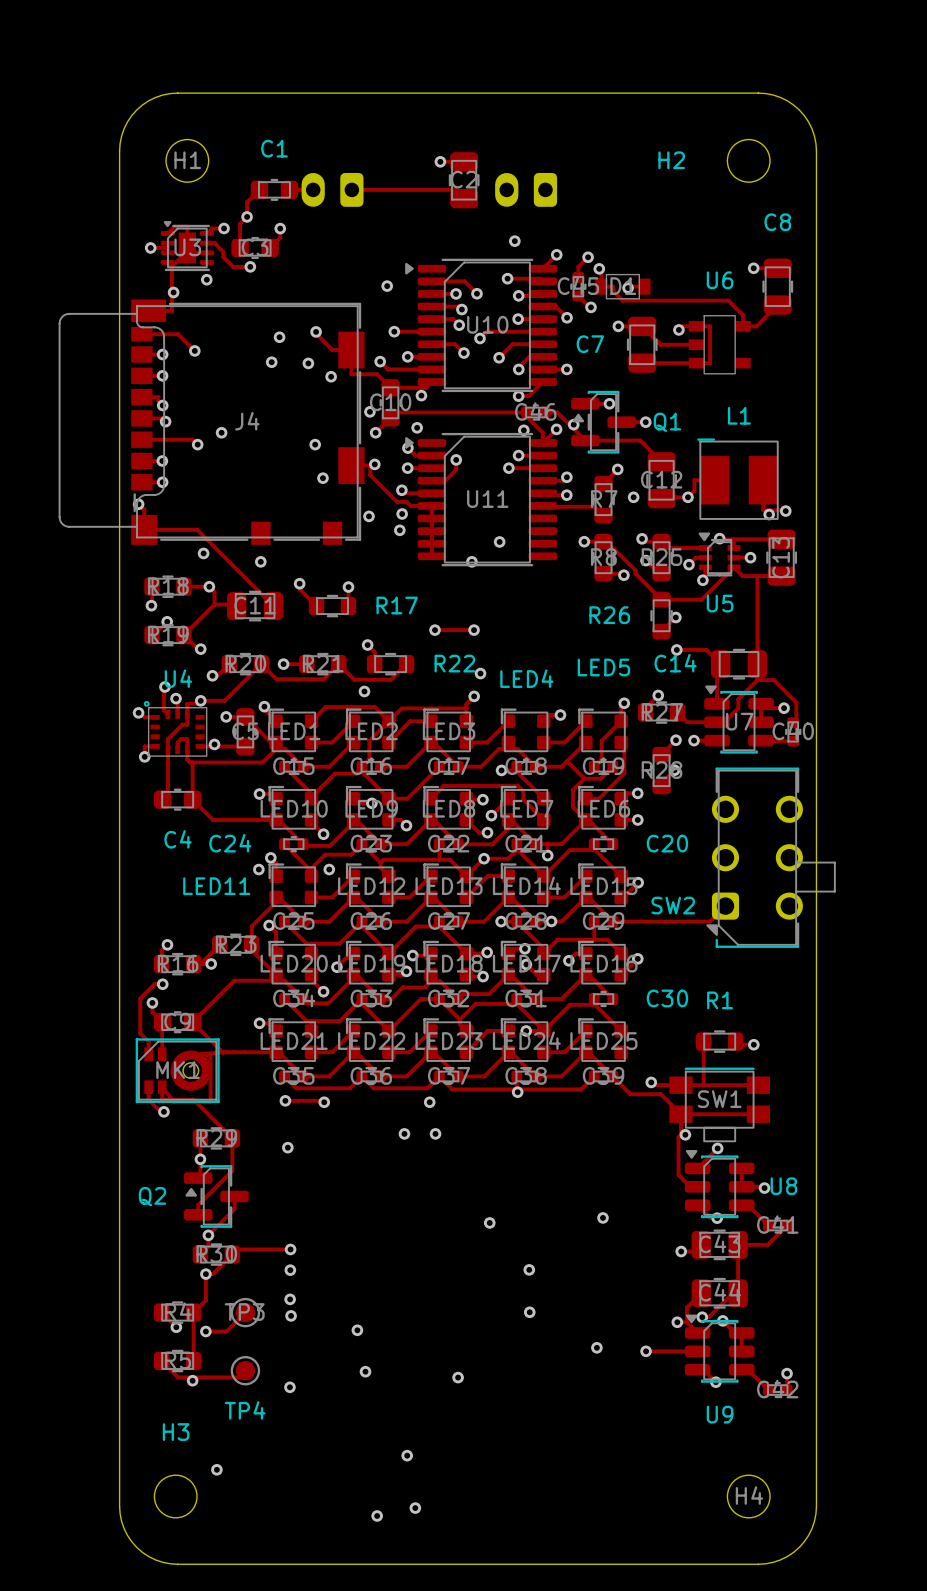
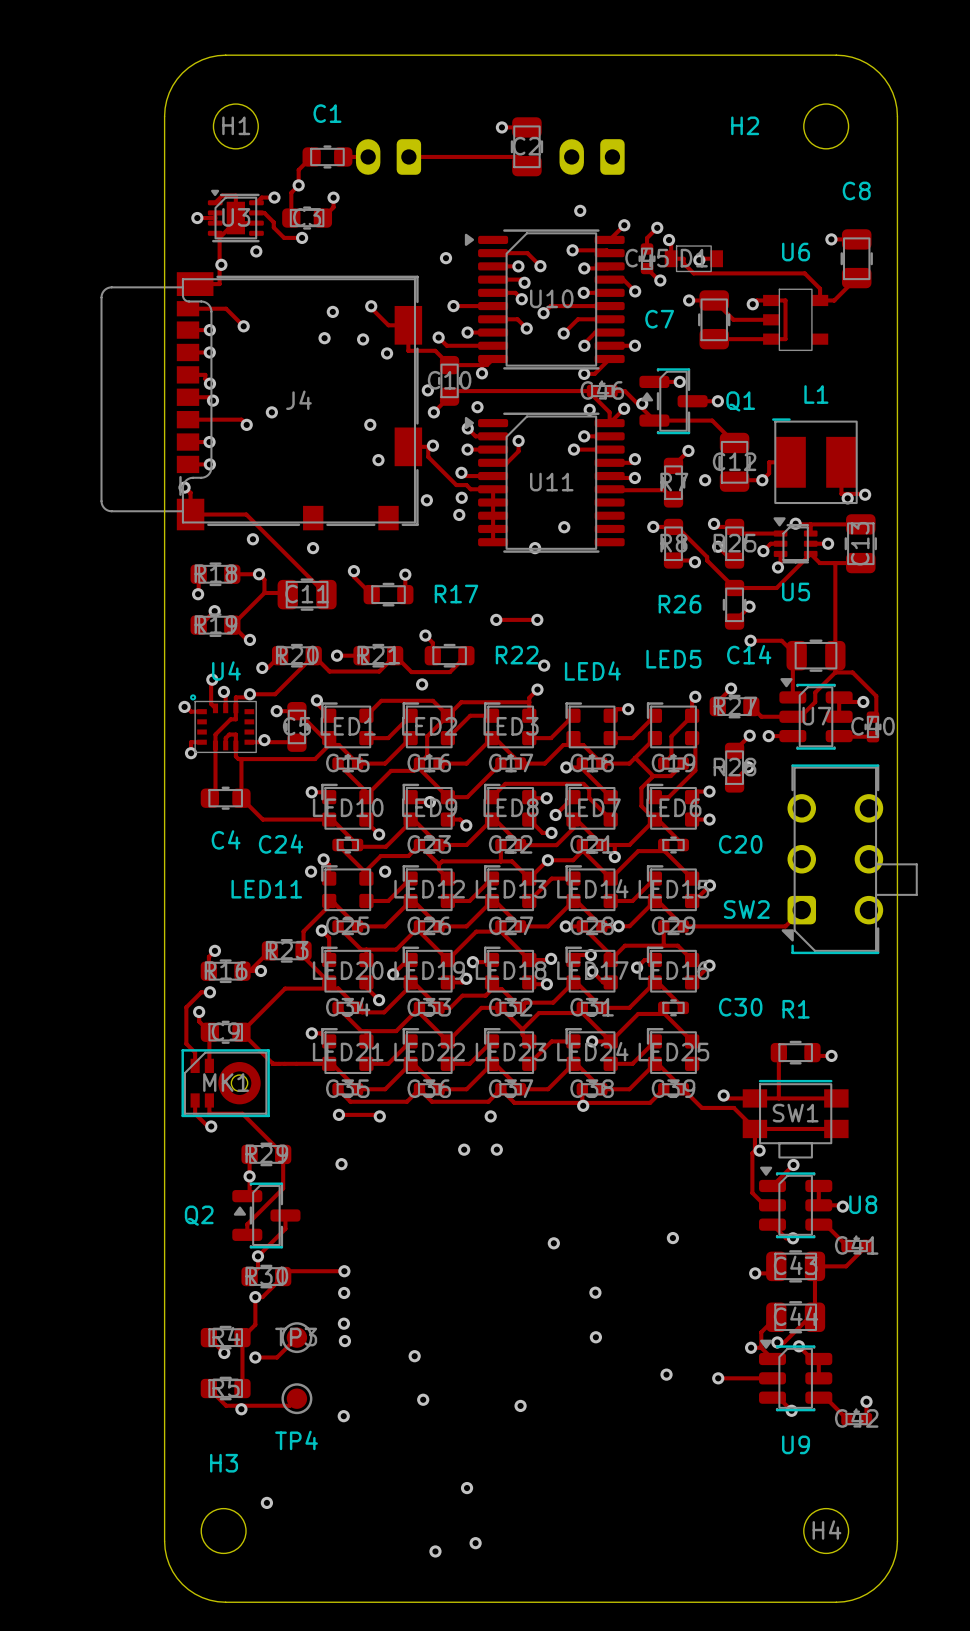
track: (222, 1052) (190, 1054) (210, 1055) (210, 1101) (173, 1101) (162, 1087) -> none

